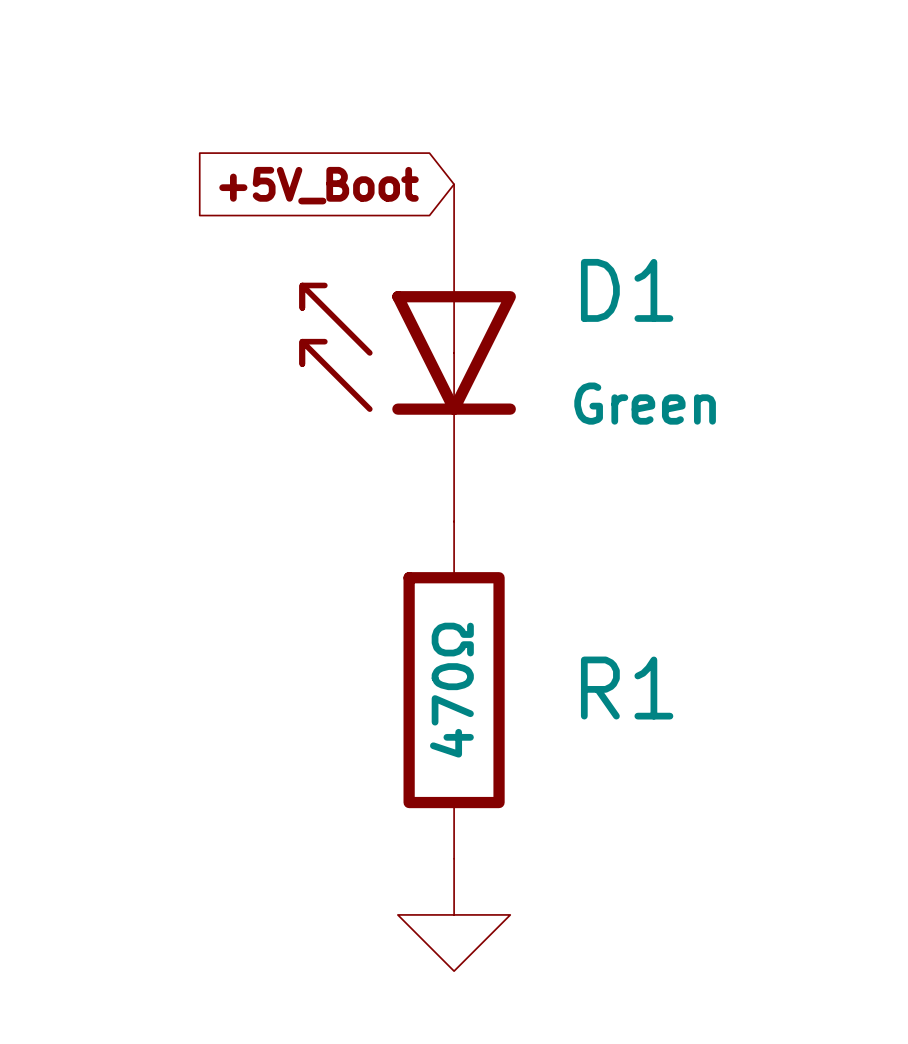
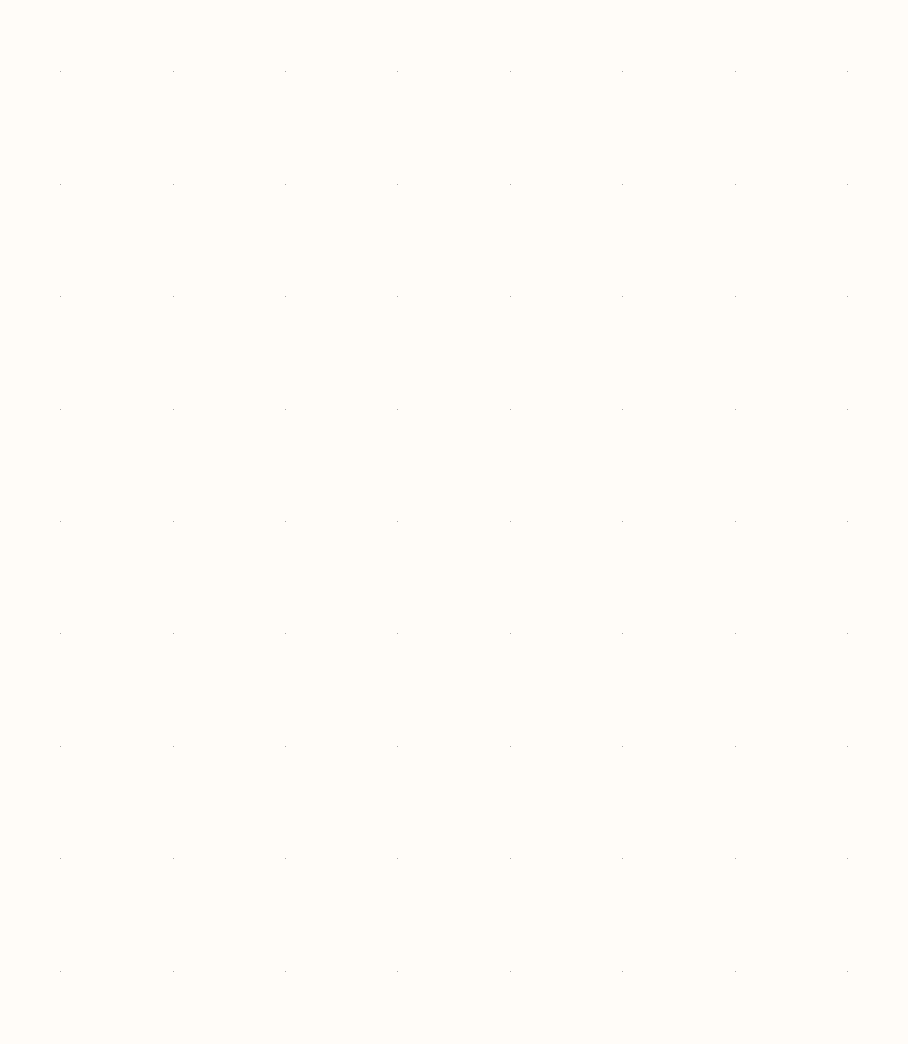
global label: +5V_Boot (319, 185) -> none
D1: Green (407, 352) -> none
R1: 470Ω (454, 690) -> none
power symbol: (454, 914) -> none

